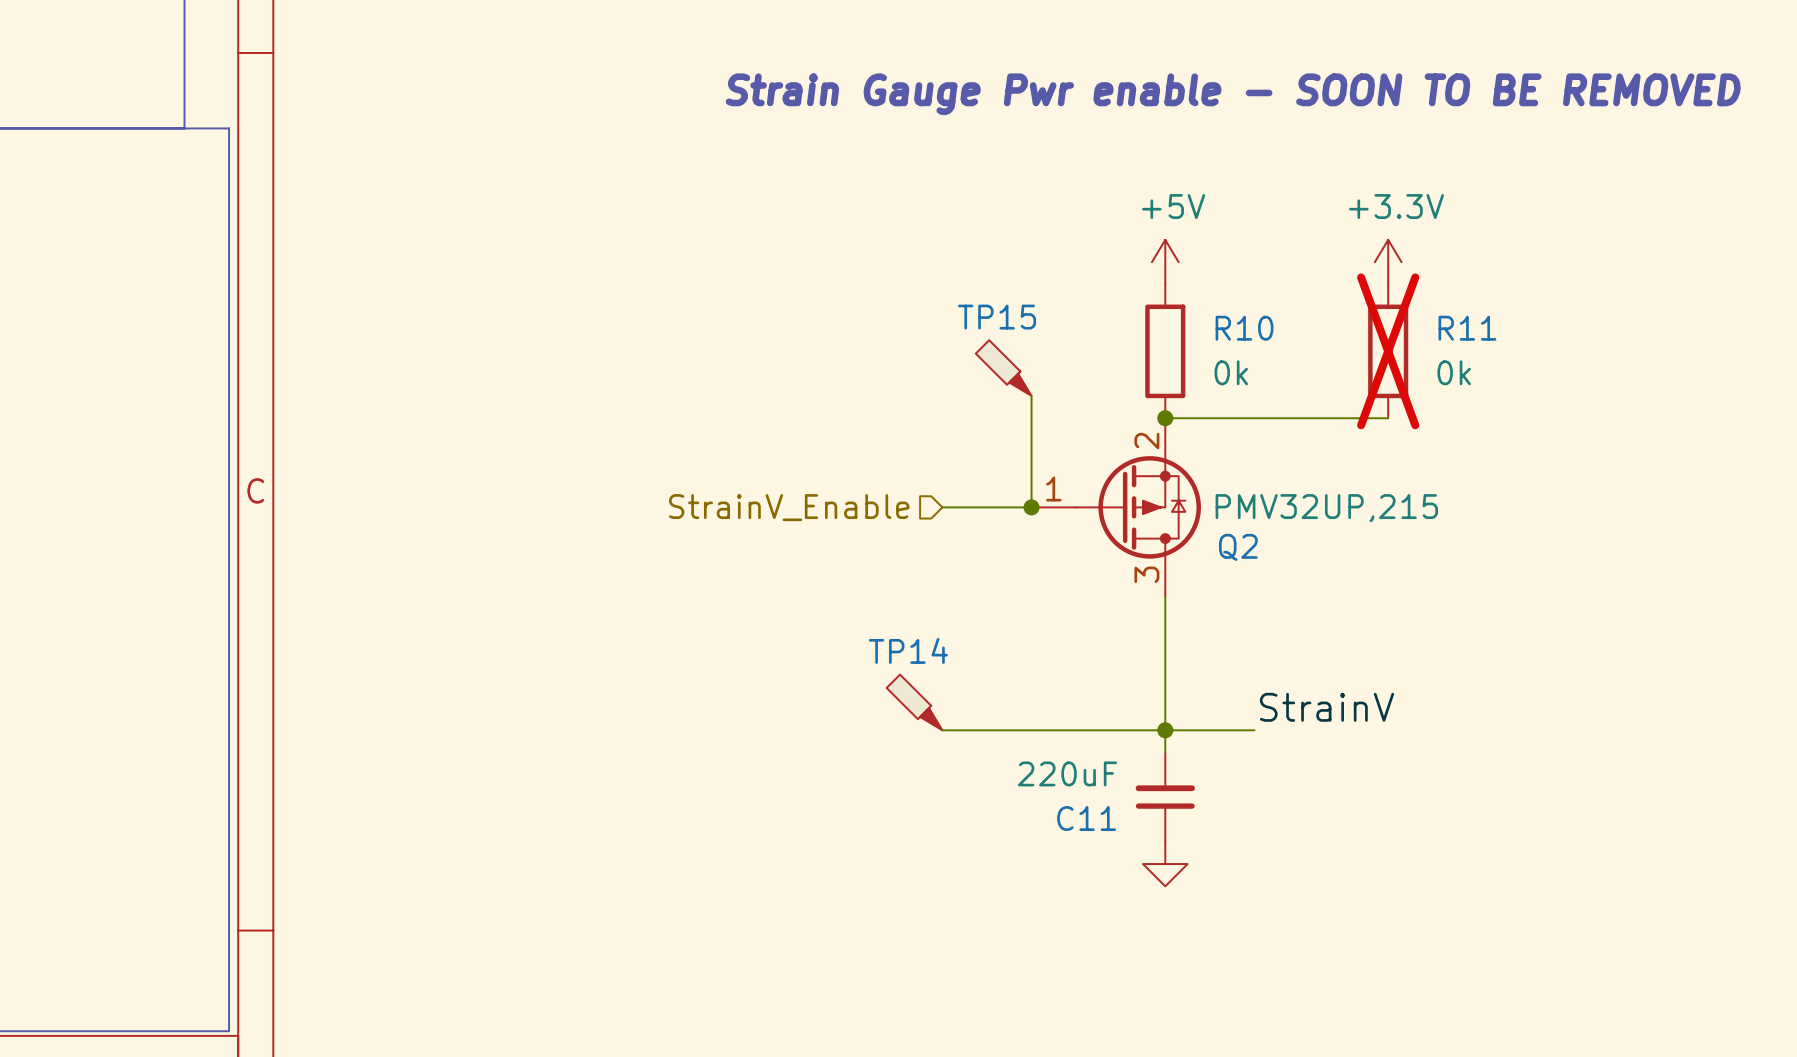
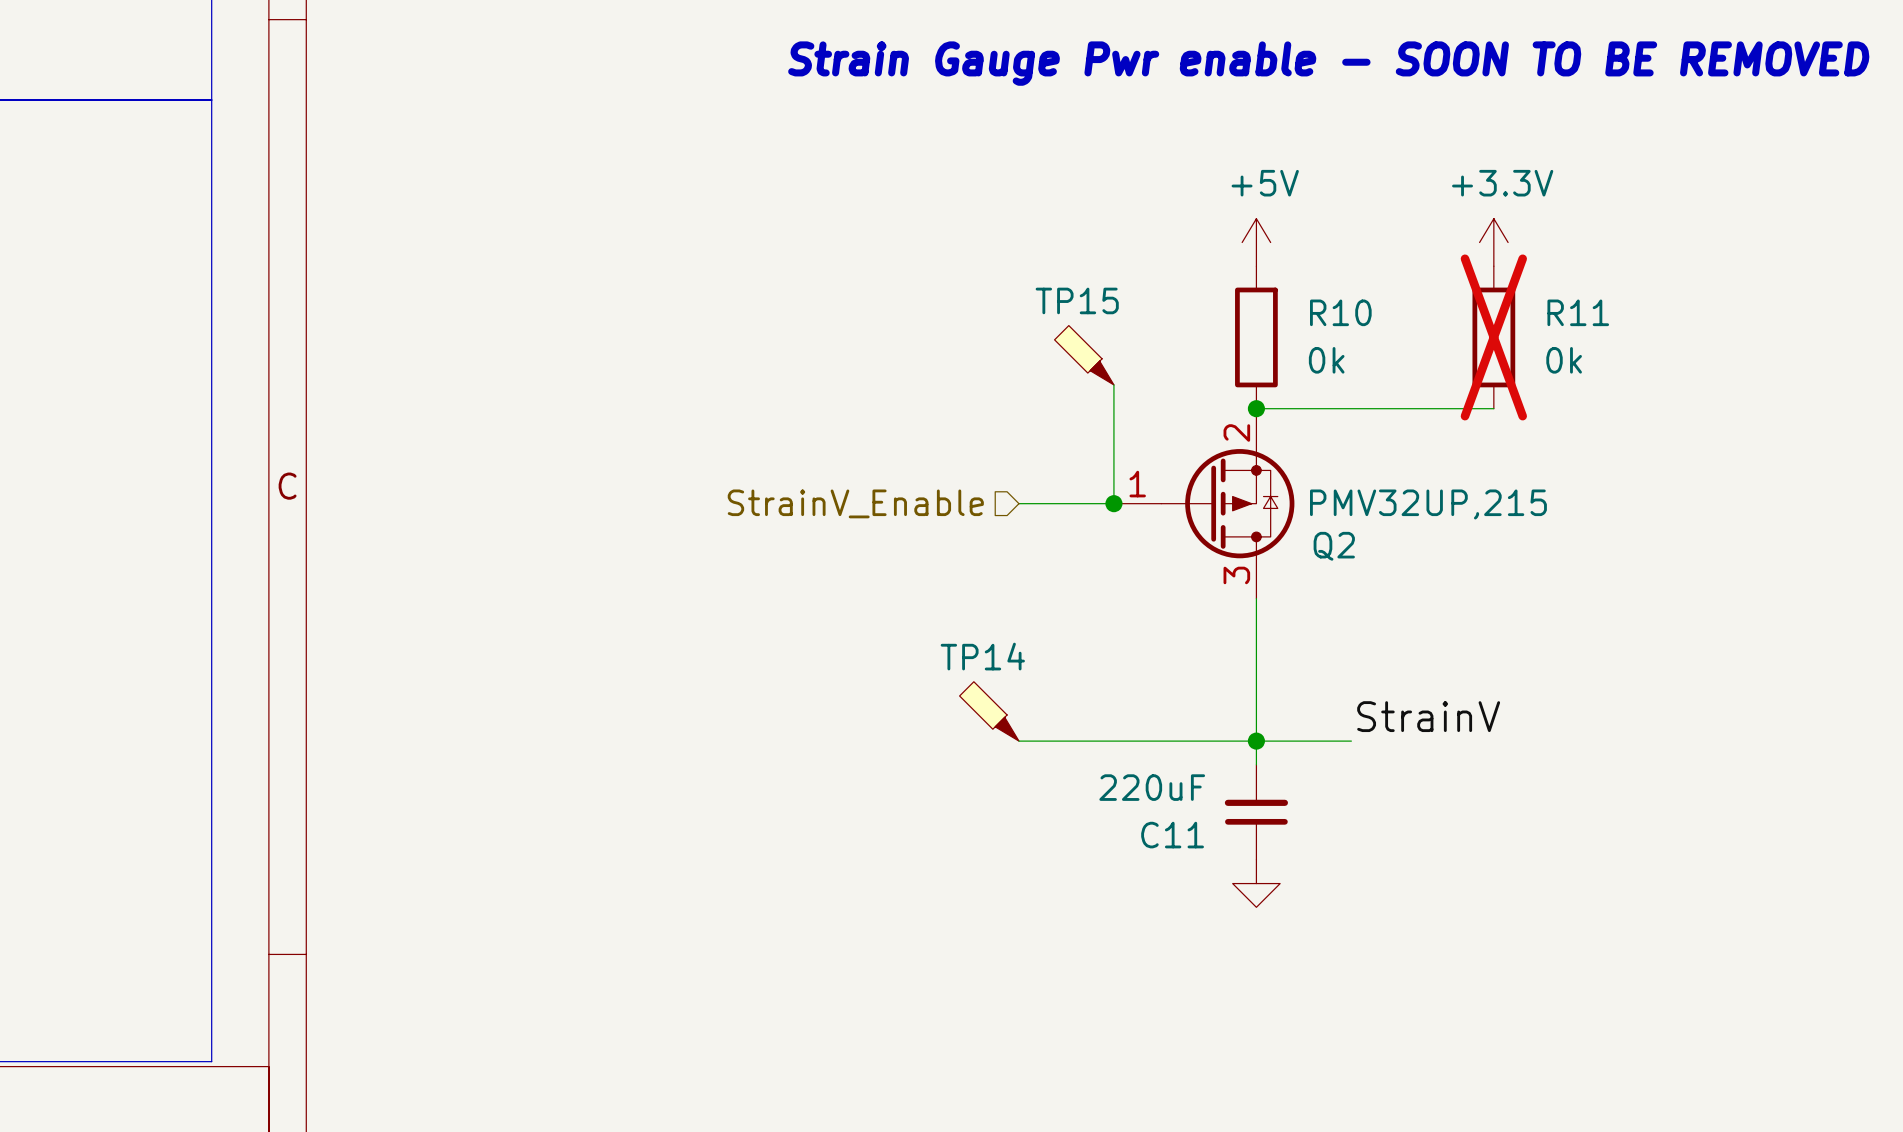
line: (184, 128) (229, 128) (229, 1031) (184, 1031) -> (211, 100) (211, 1061)

